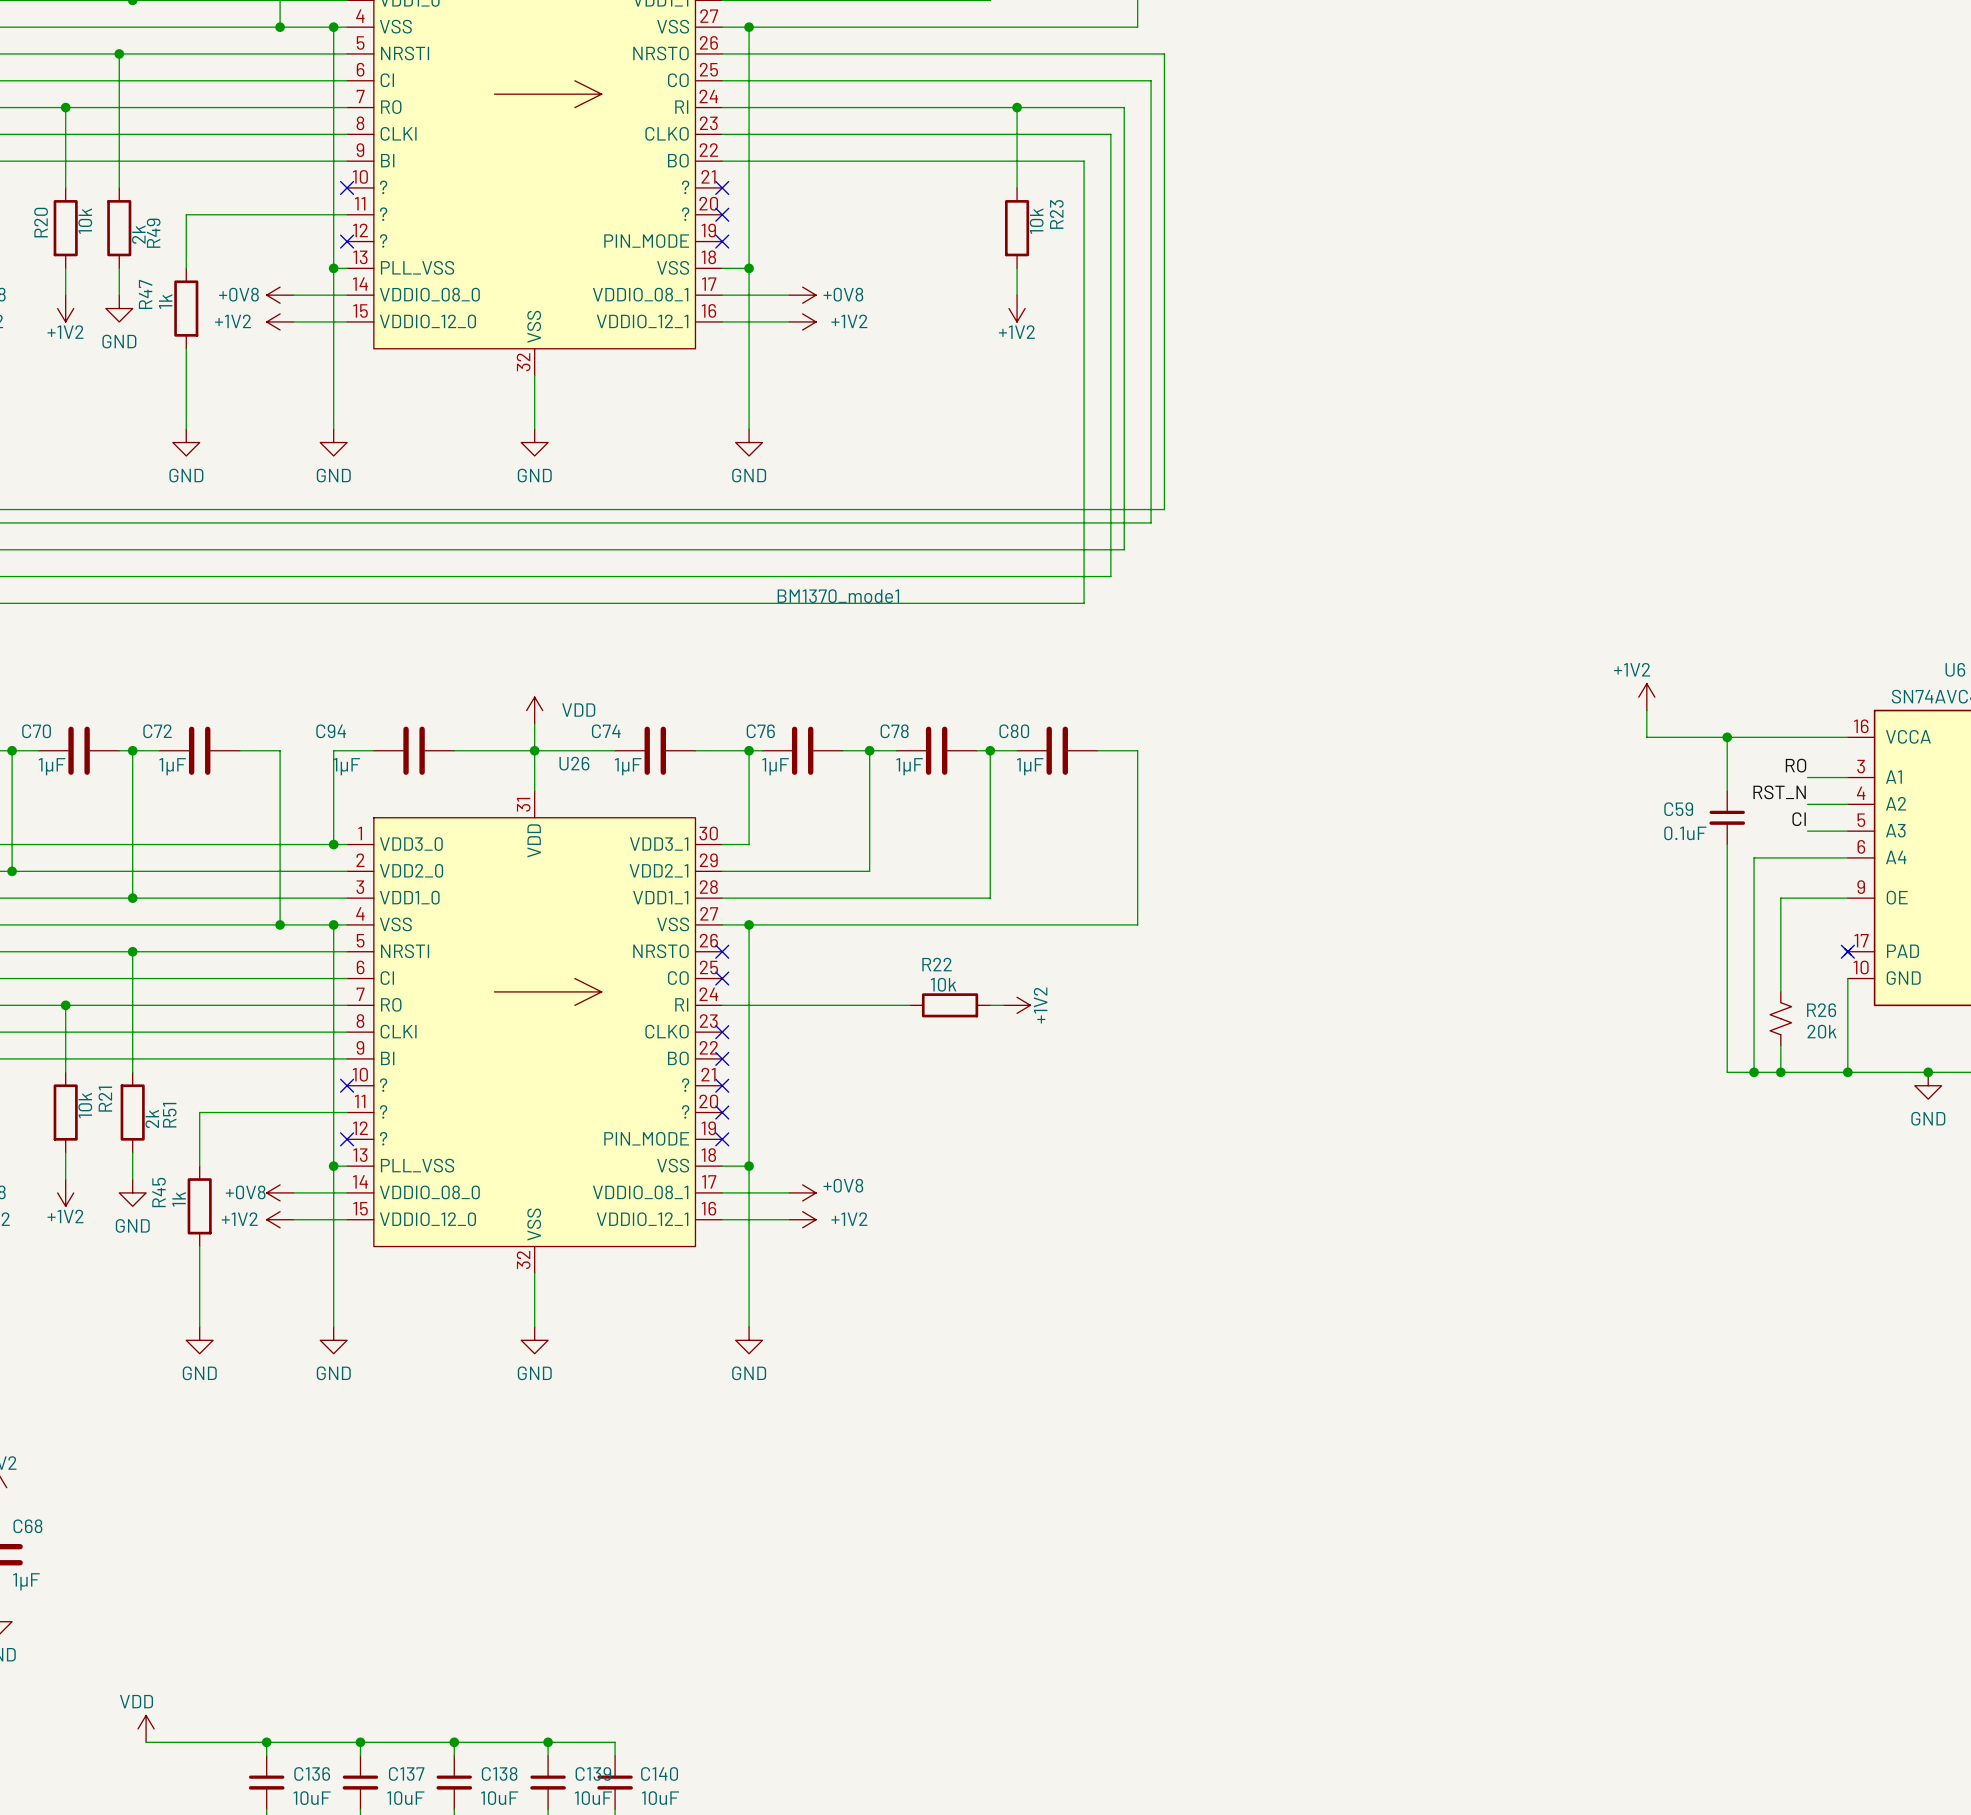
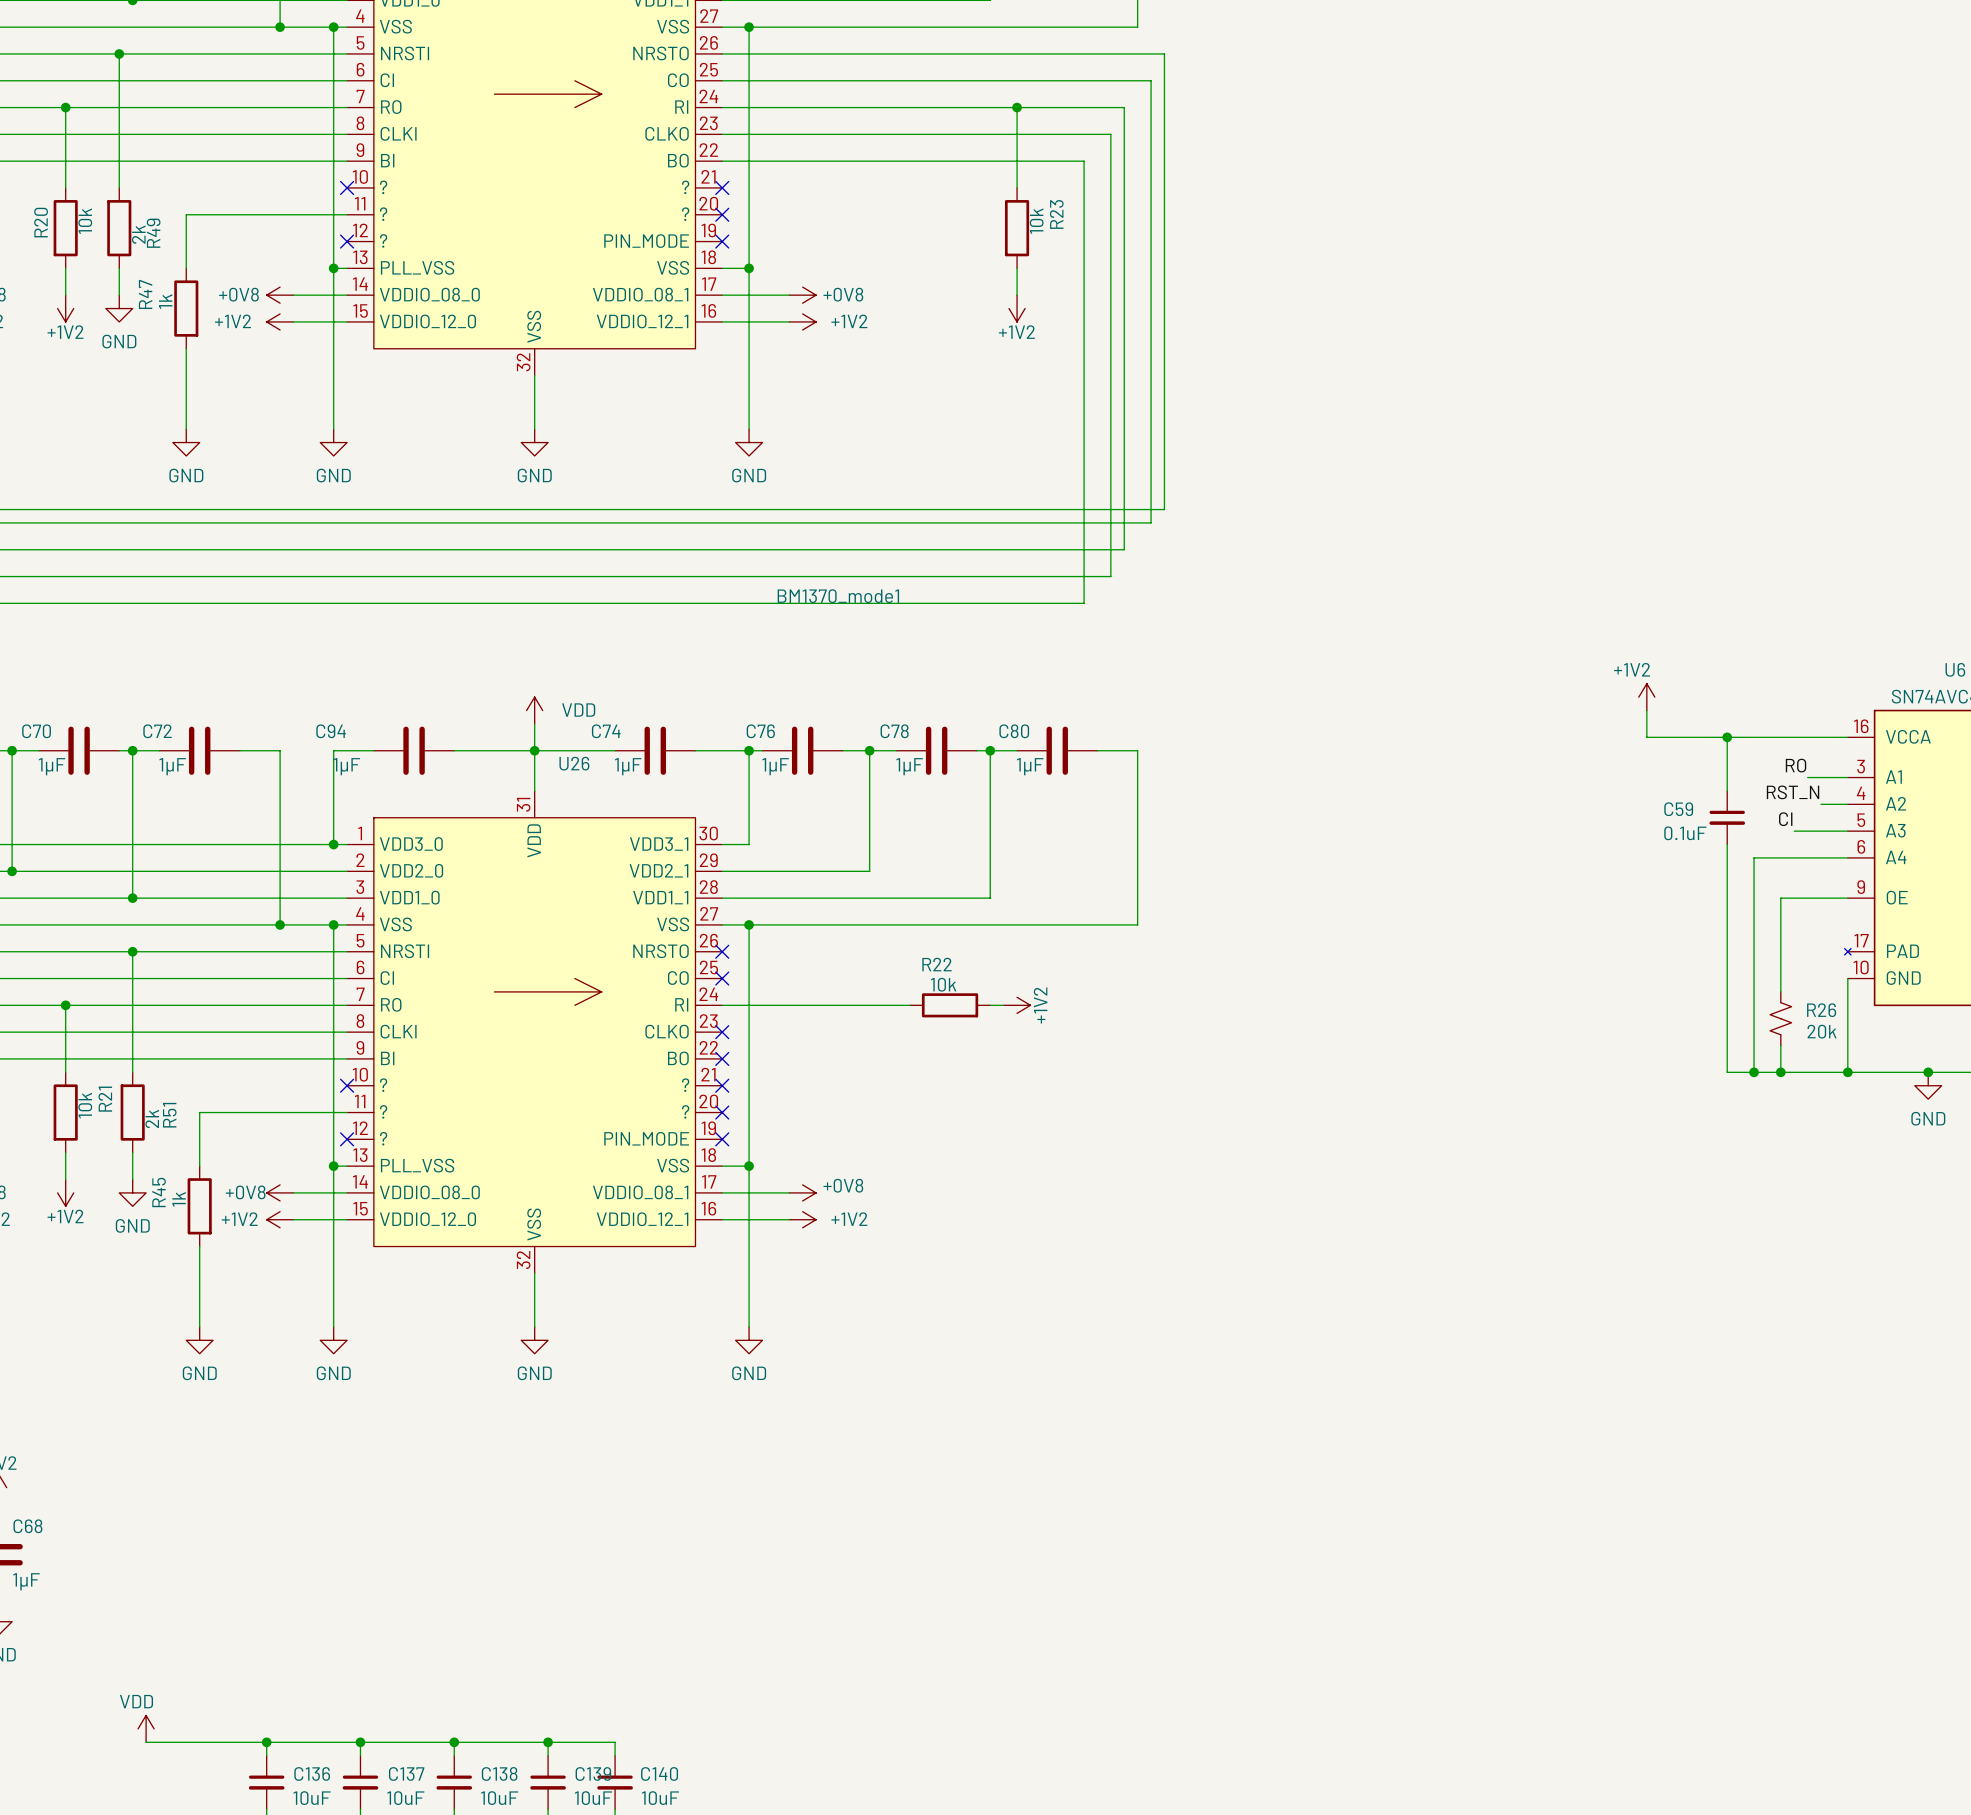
label position: RST_N (1779, 792) -> RST_N (1793, 792)
wire: (1807, 804) (1821, 804) -> (1794, 831) (1807, 831)
label position: CI (1799, 819) -> CI (1785, 819)
no-connect mark: (1847, 951) -> none

